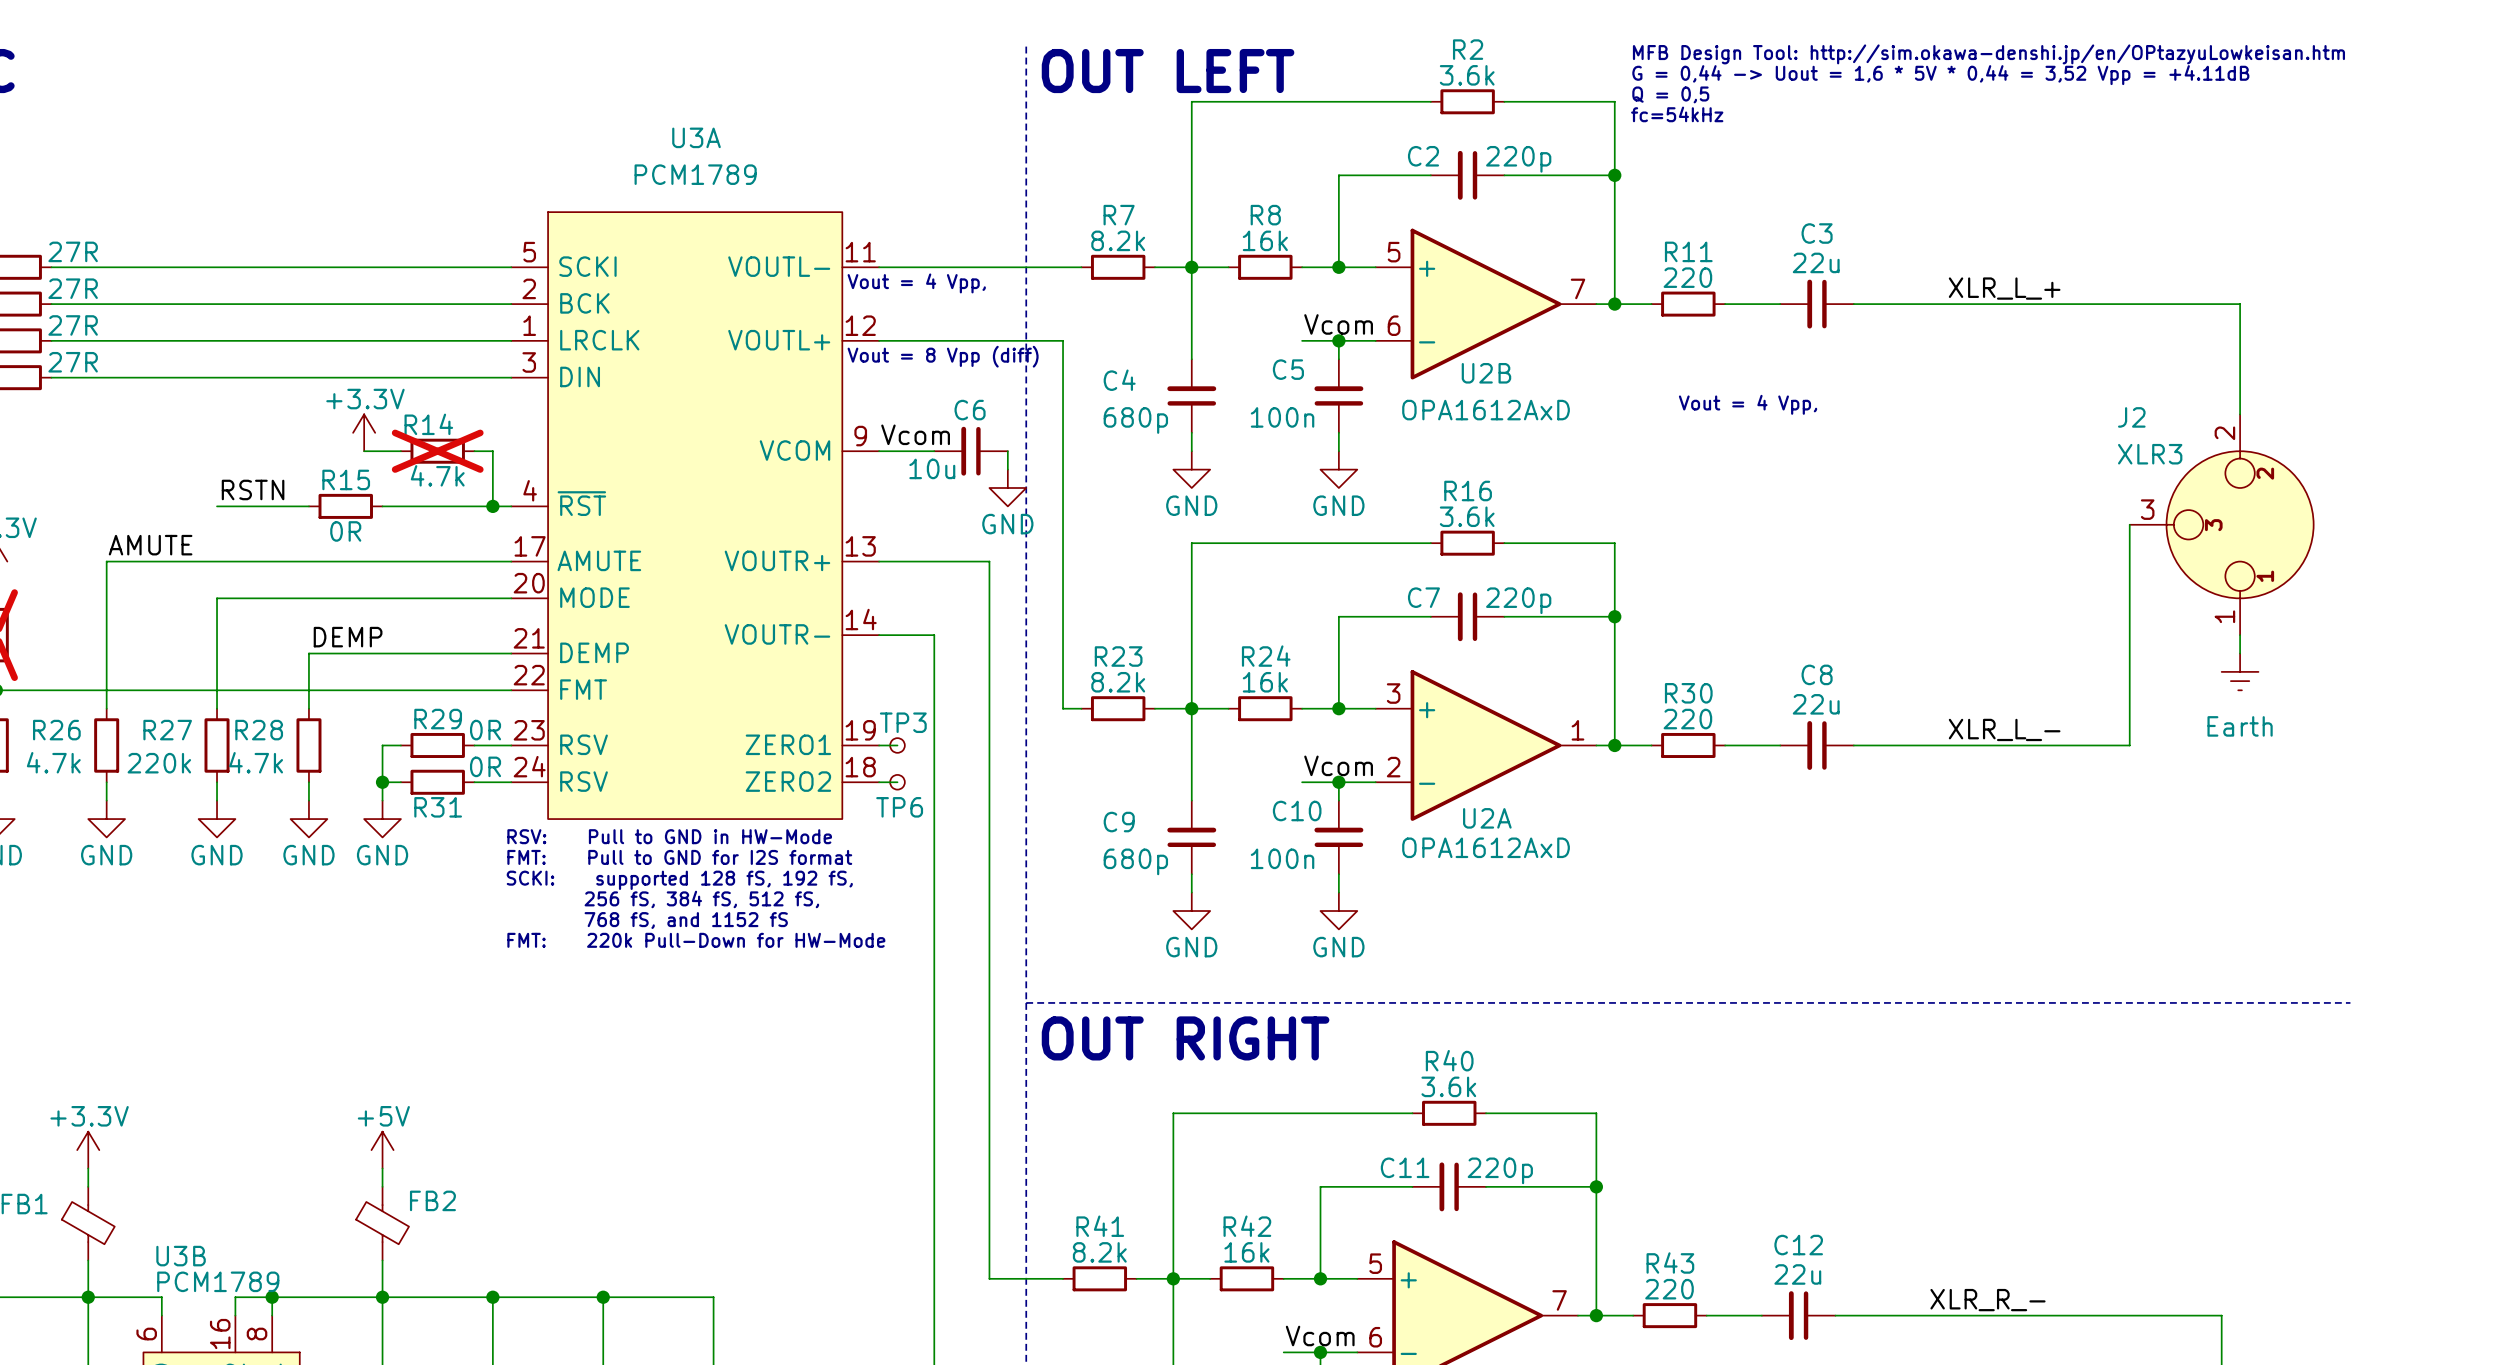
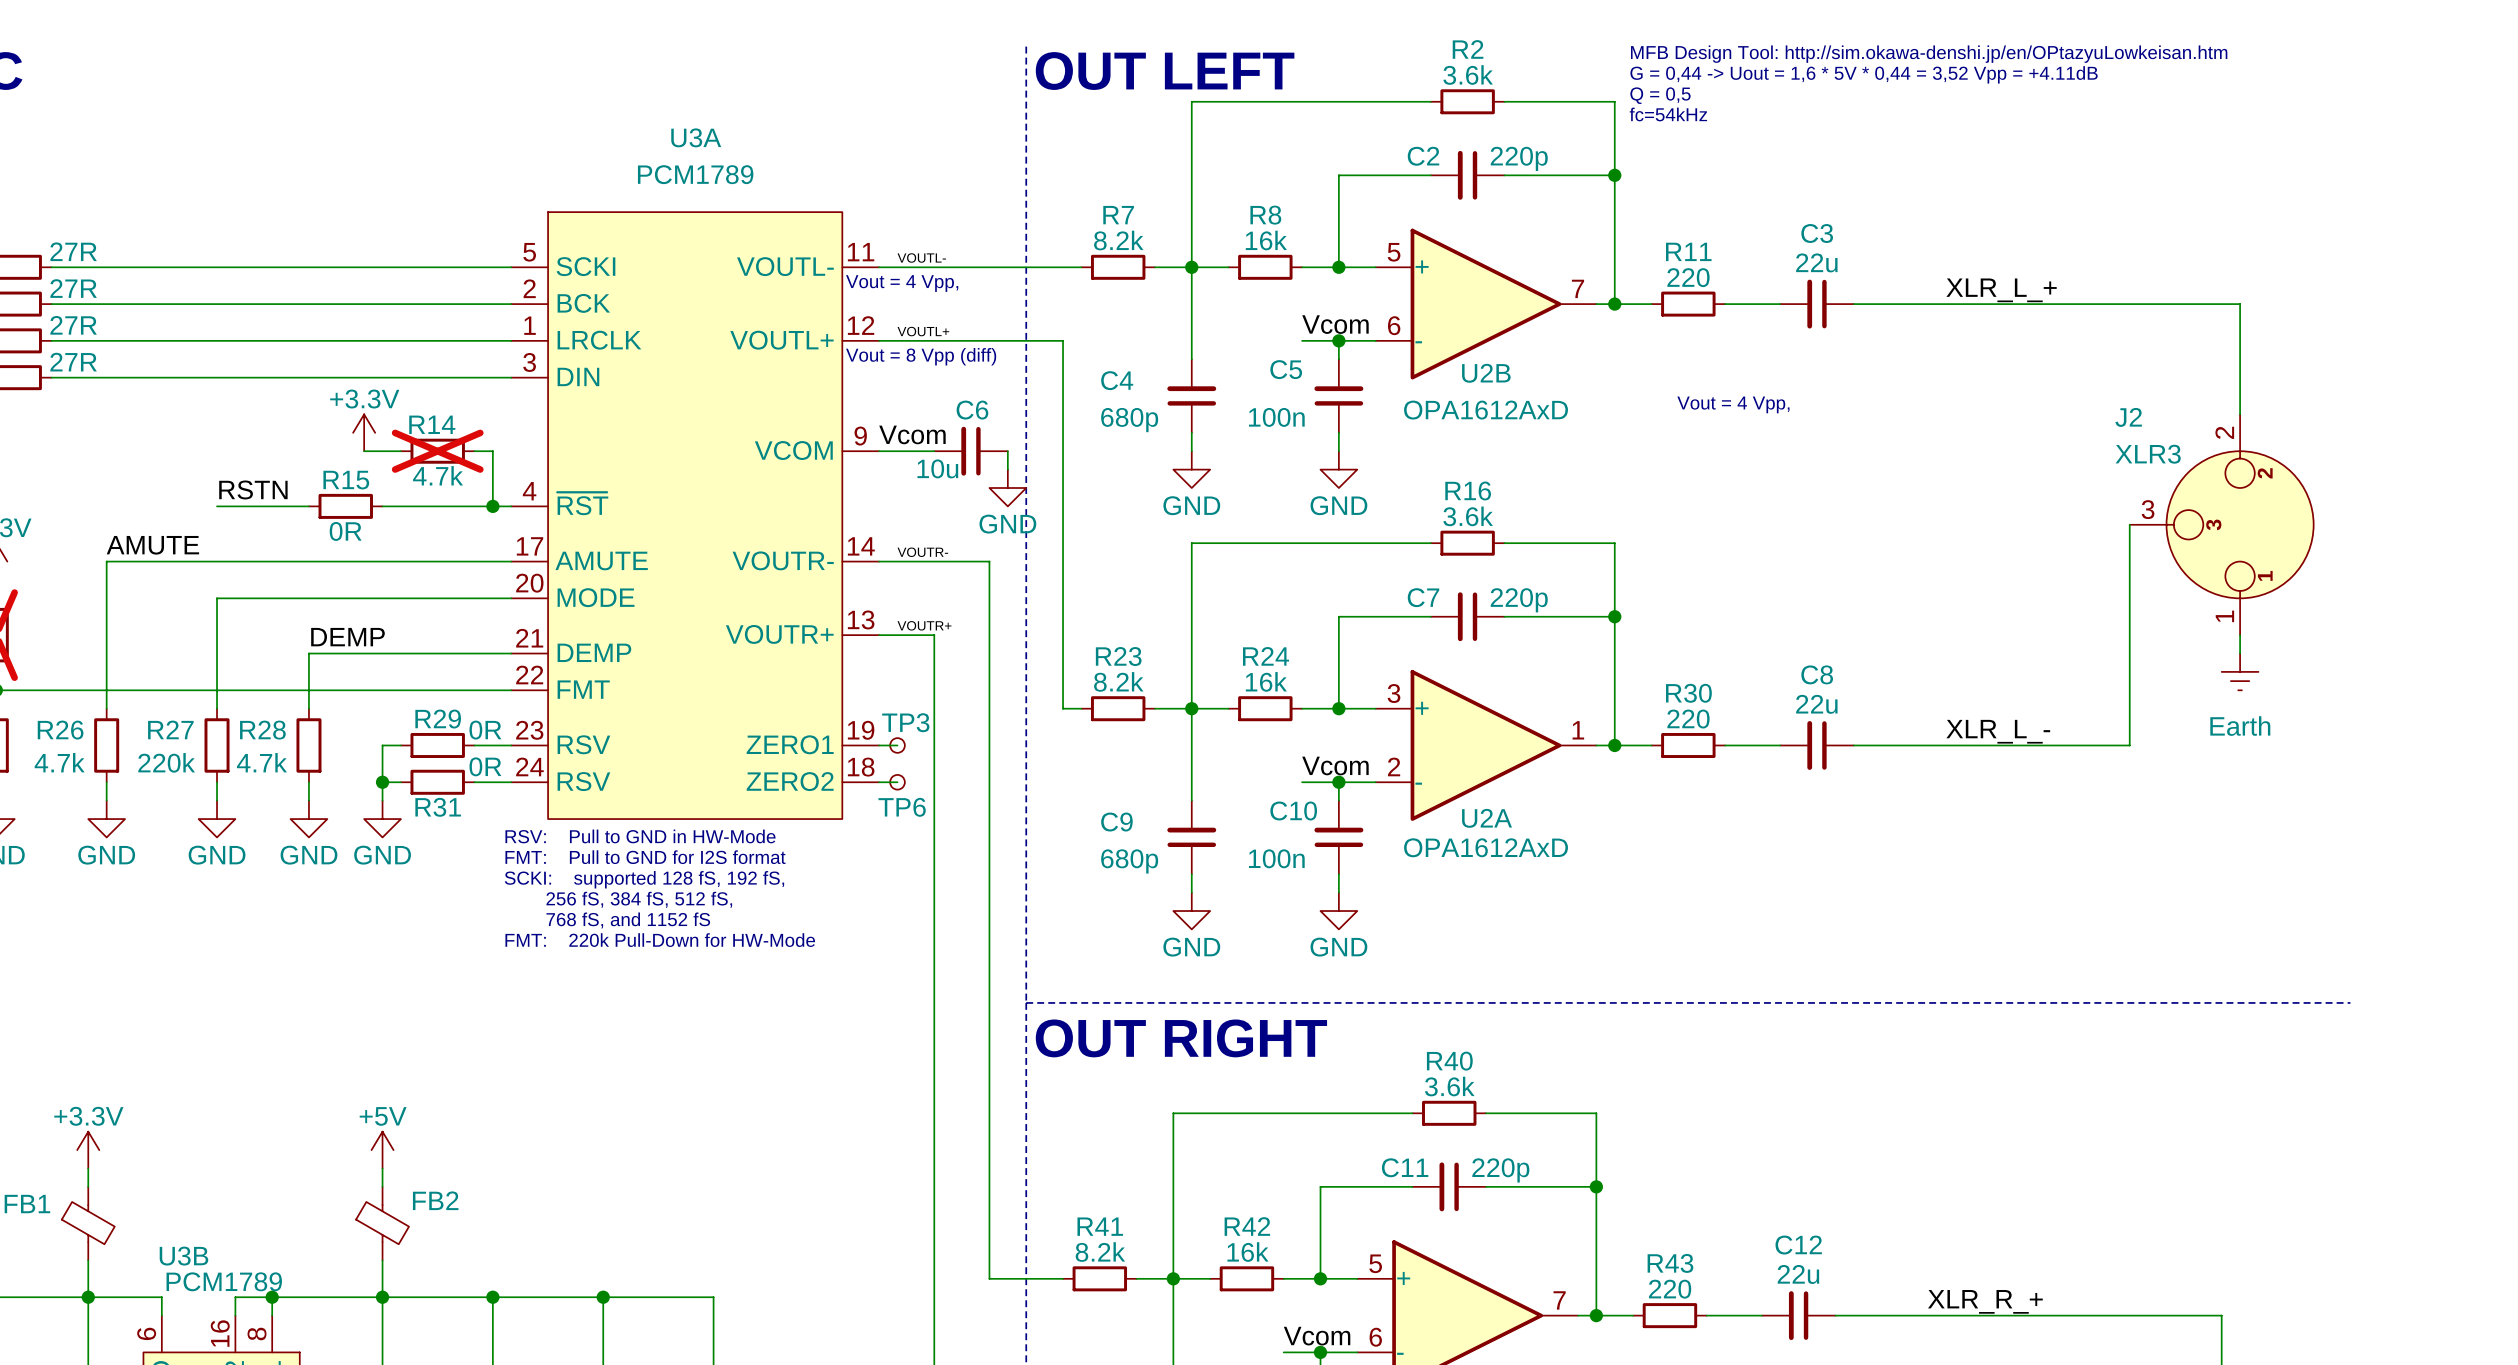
label: none -> VOUTL- (921, 257)
label: none -> VOUTL+ (923, 331)
U3A pin number: 13 (860, 546) -> 14 (861, 546)
label: none -> VOUTR- (922, 552)
U3A pin name: VOUTR+ (777, 560) -> VOUTR- (783, 560)
U3A pin number: 14 (861, 619) -> 13 (861, 619)
label: none -> VOUTR+ (924, 625)
U3A pin name: VOUTR- (777, 634) -> VOUTR+ (779, 634)
label: XLR_R_- (1987, 1300) -> XLR_R_+ (1985, 1301)

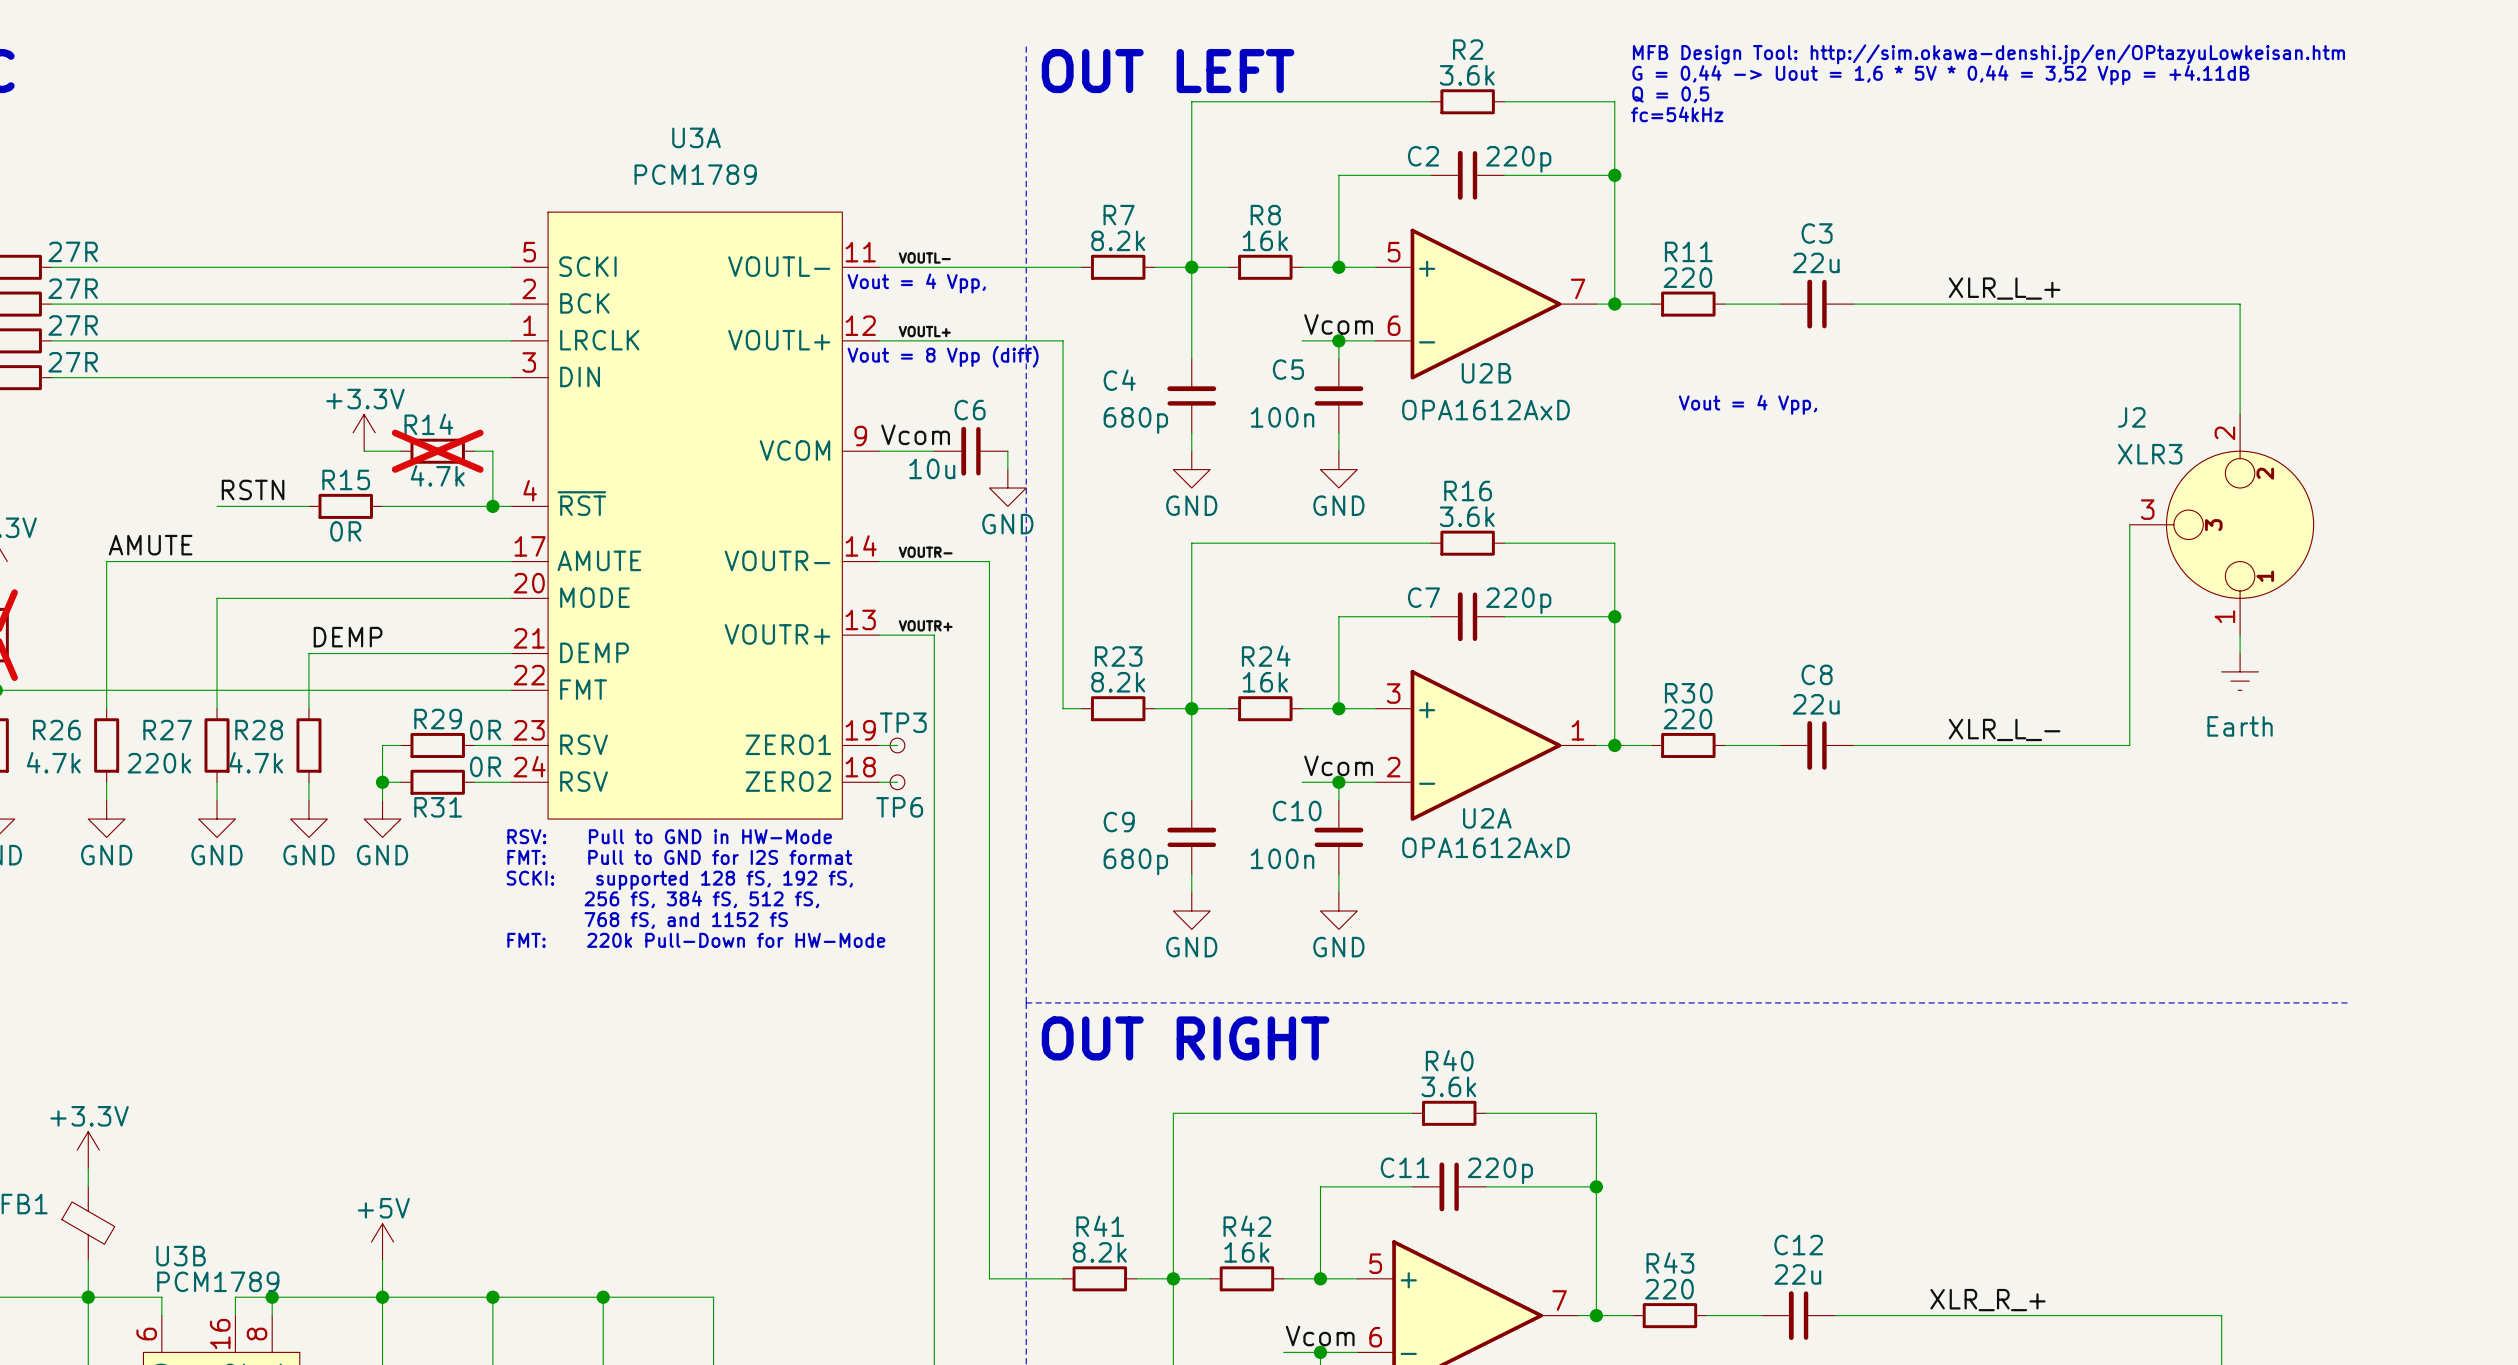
power symbol position: +5V (382, 1150) -> +5V (382, 1242)
wire: (382, 1168) (382, 1186) -> none
FB2: (382, 1223) -> none

